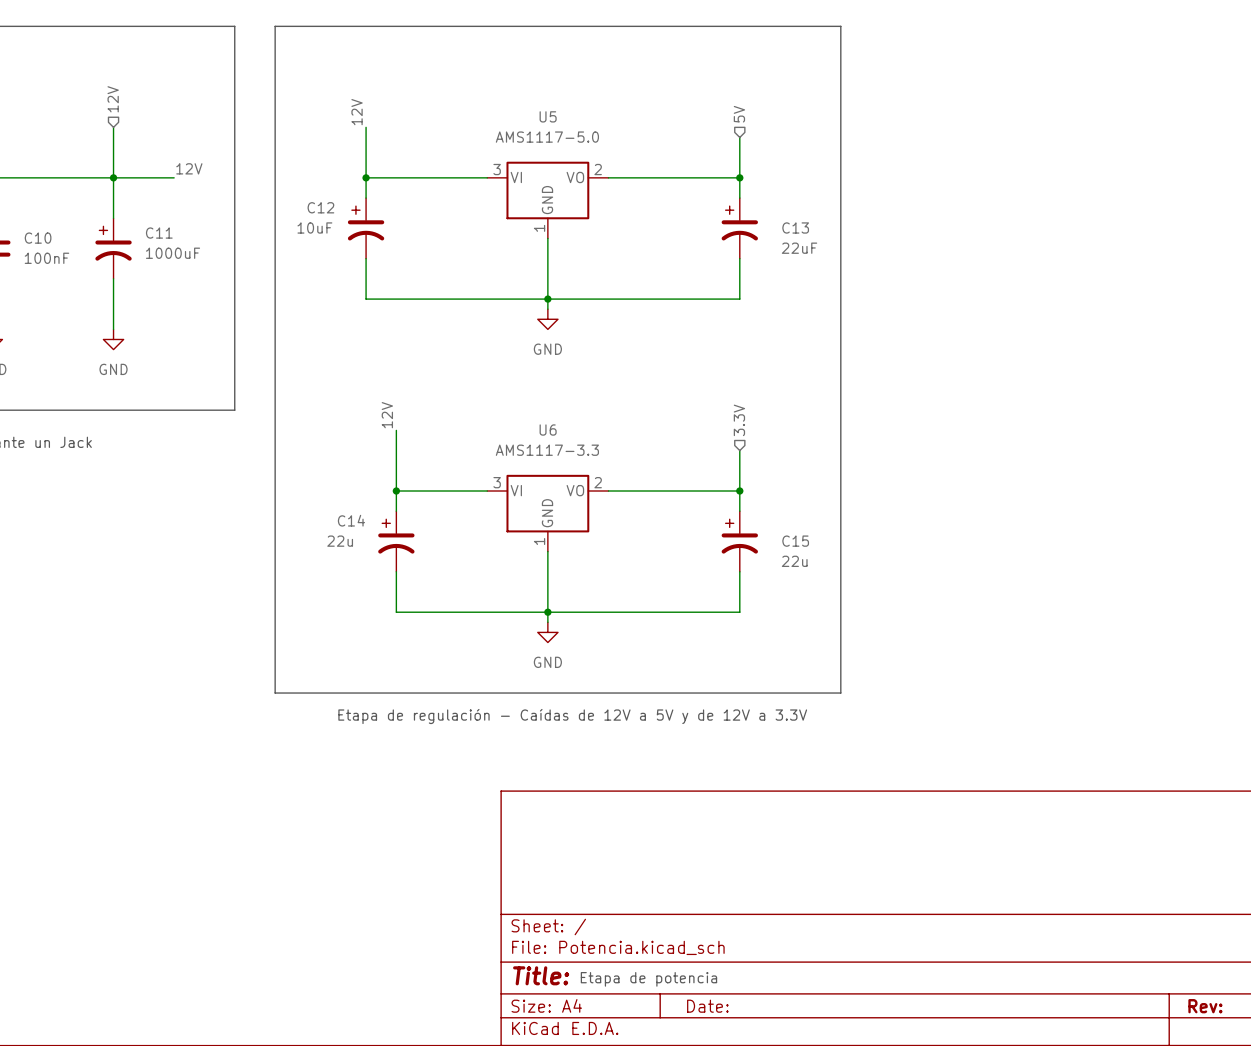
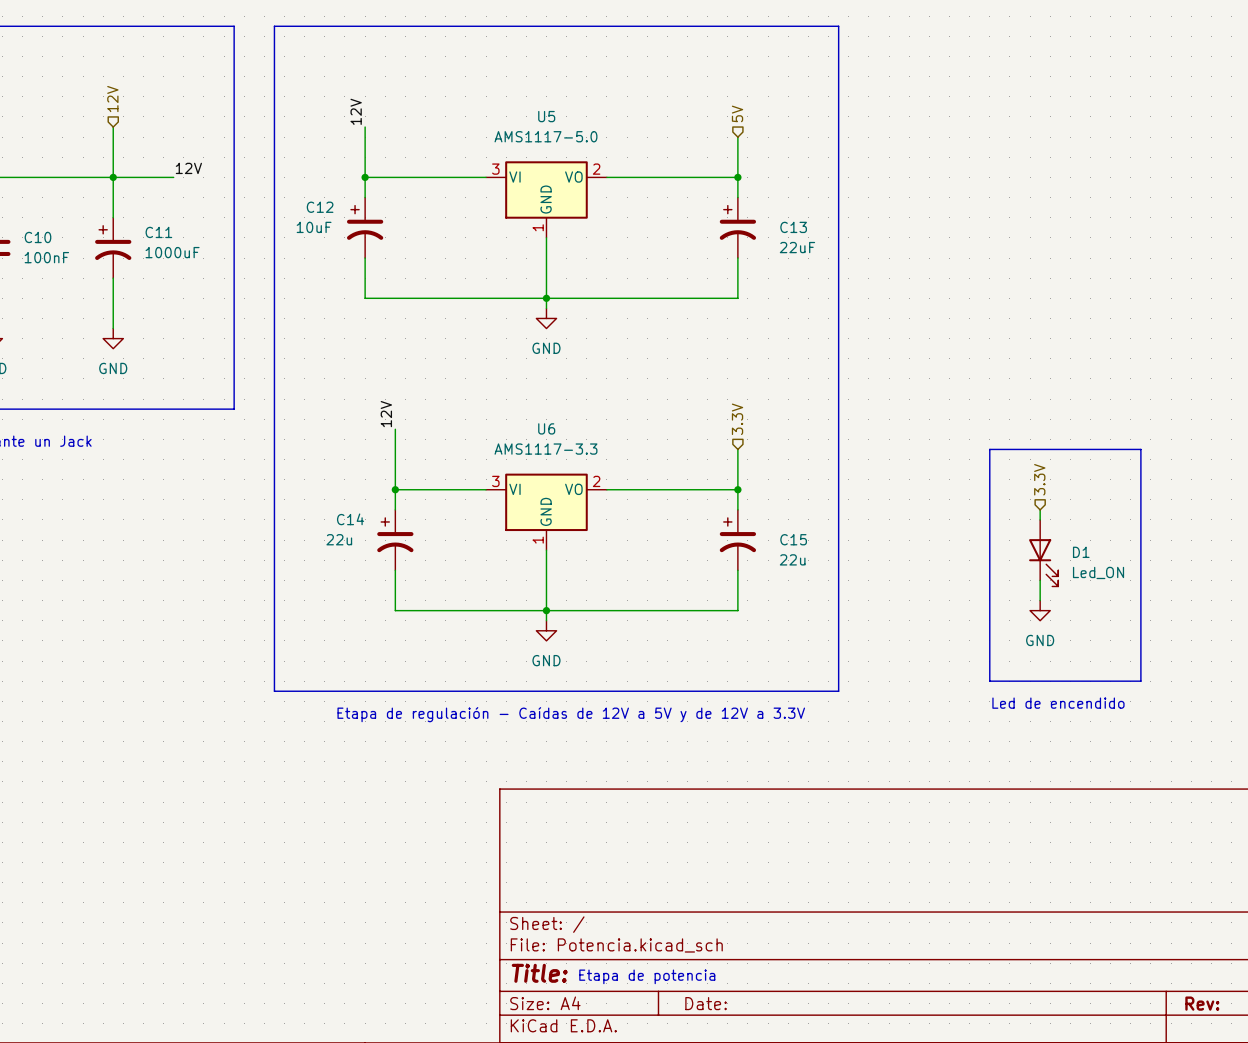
line: none -> (989, 449) (989, 681) (1140, 681) (1140, 449) (989, 449)
hierarchical label: none -> 3.3V (1039, 479)
wire: none -> (1040, 509) (1040, 519)
D1: none -> Led_ON (1043, 553)
wire: none -> (1040, 580) (1040, 600)
power symbol: none -> GND (1040, 610)
text: none -> Led de encendido (1058, 703)

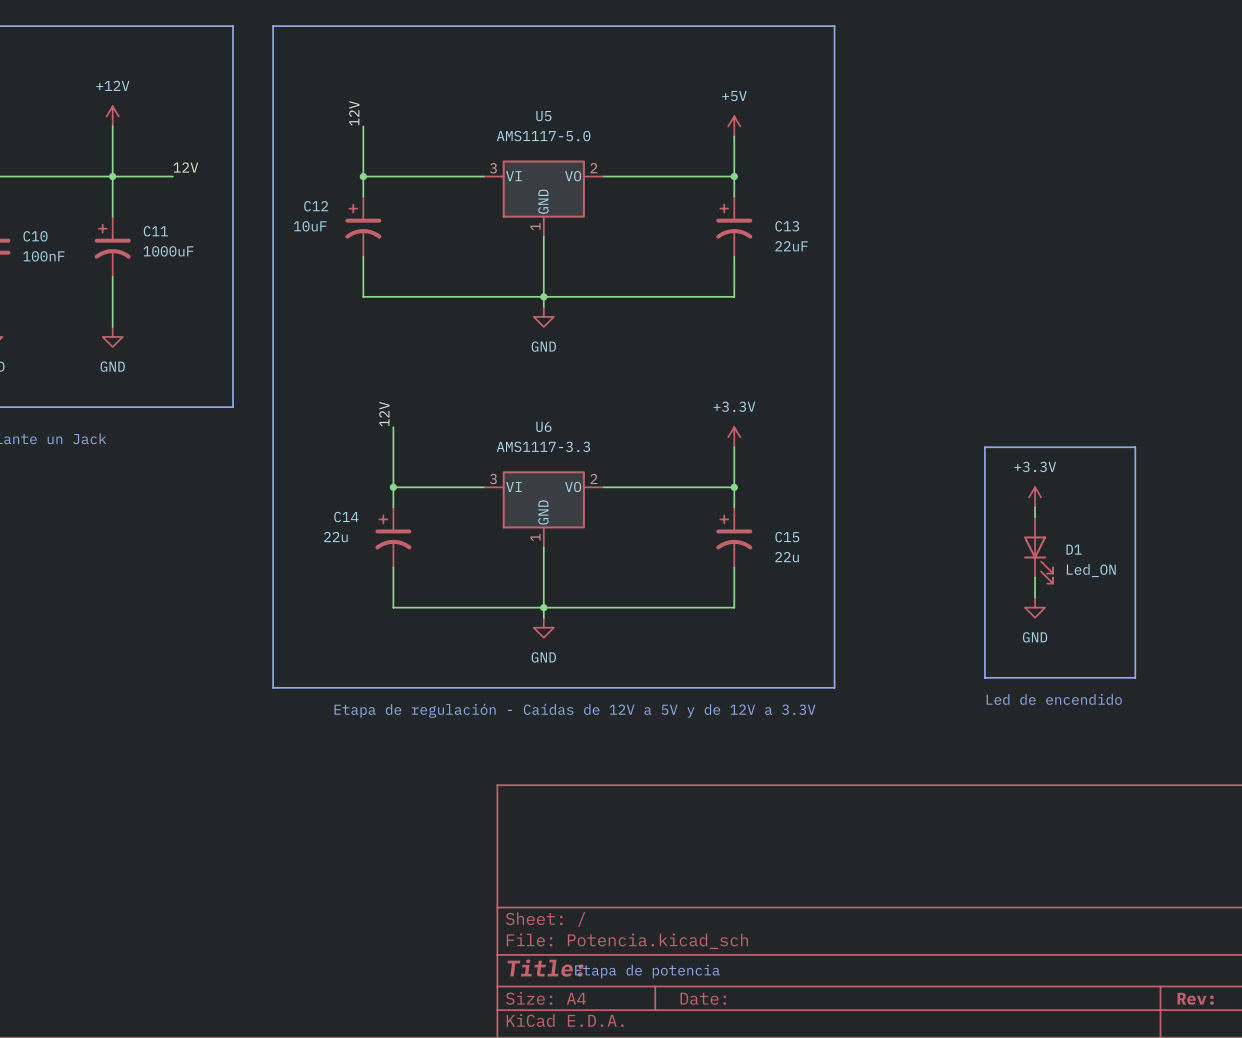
hierarchical label: 12V (112, 99) -> none
hierarchical label: 5V (737, 113) -> none
power symbol: none -> +12V (112, 116)
power symbol: none -> +5V (734, 126)
hierarchical label: 3.3V (737, 419) -> none
power symbol: none -> +3.3V (734, 437)
hierarchical label: 3.3V (1039, 479) -> none
power symbol: none -> +3.3V (1035, 497)

